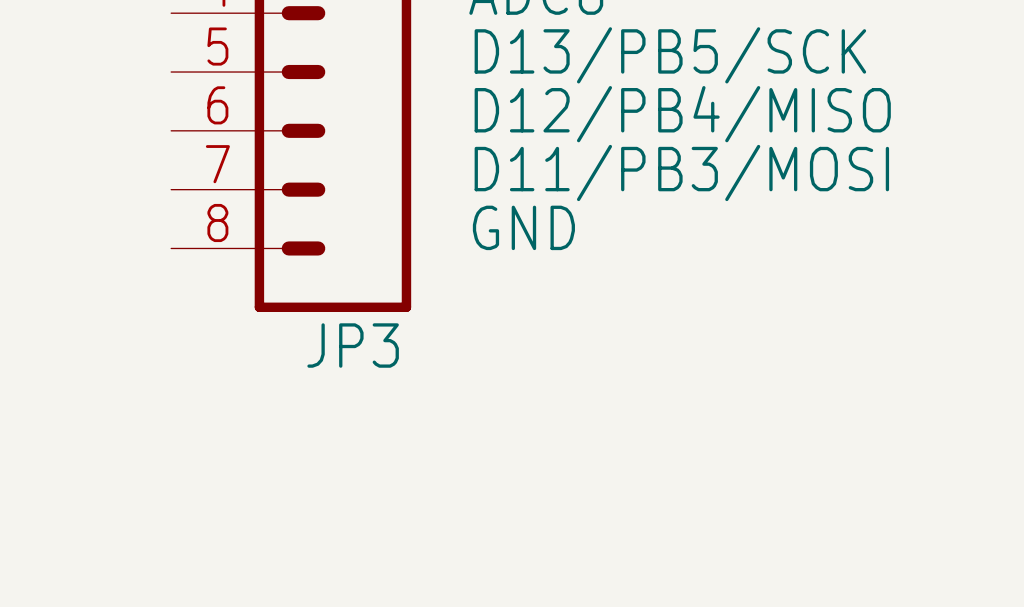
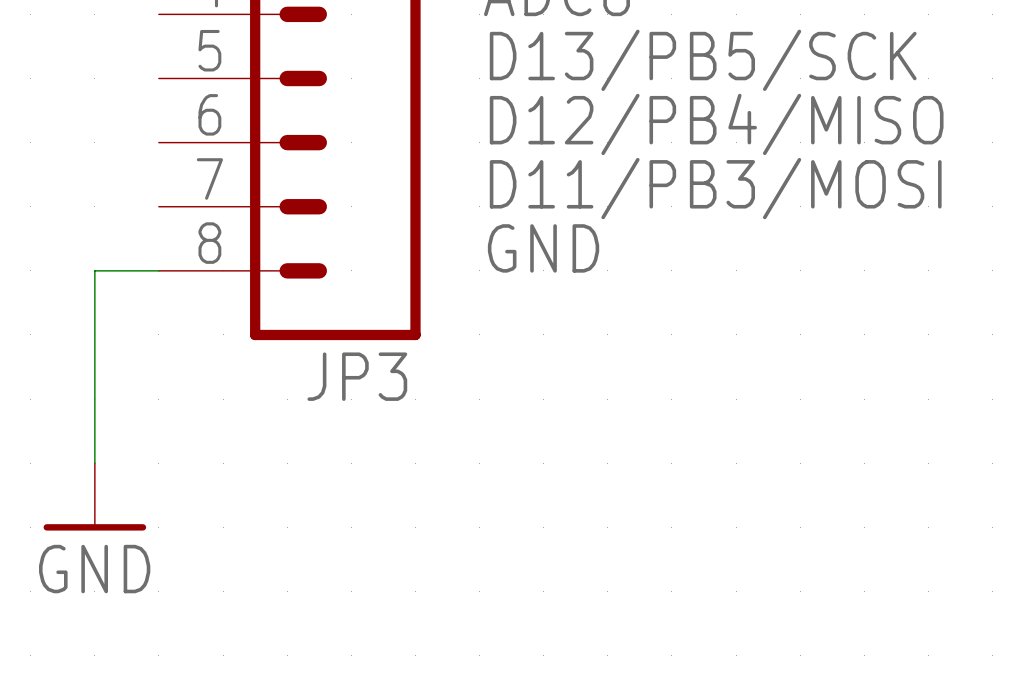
wire: none -> (158, 270) (94, 270) (94, 463)
power symbol: none -> GND (94, 496)

